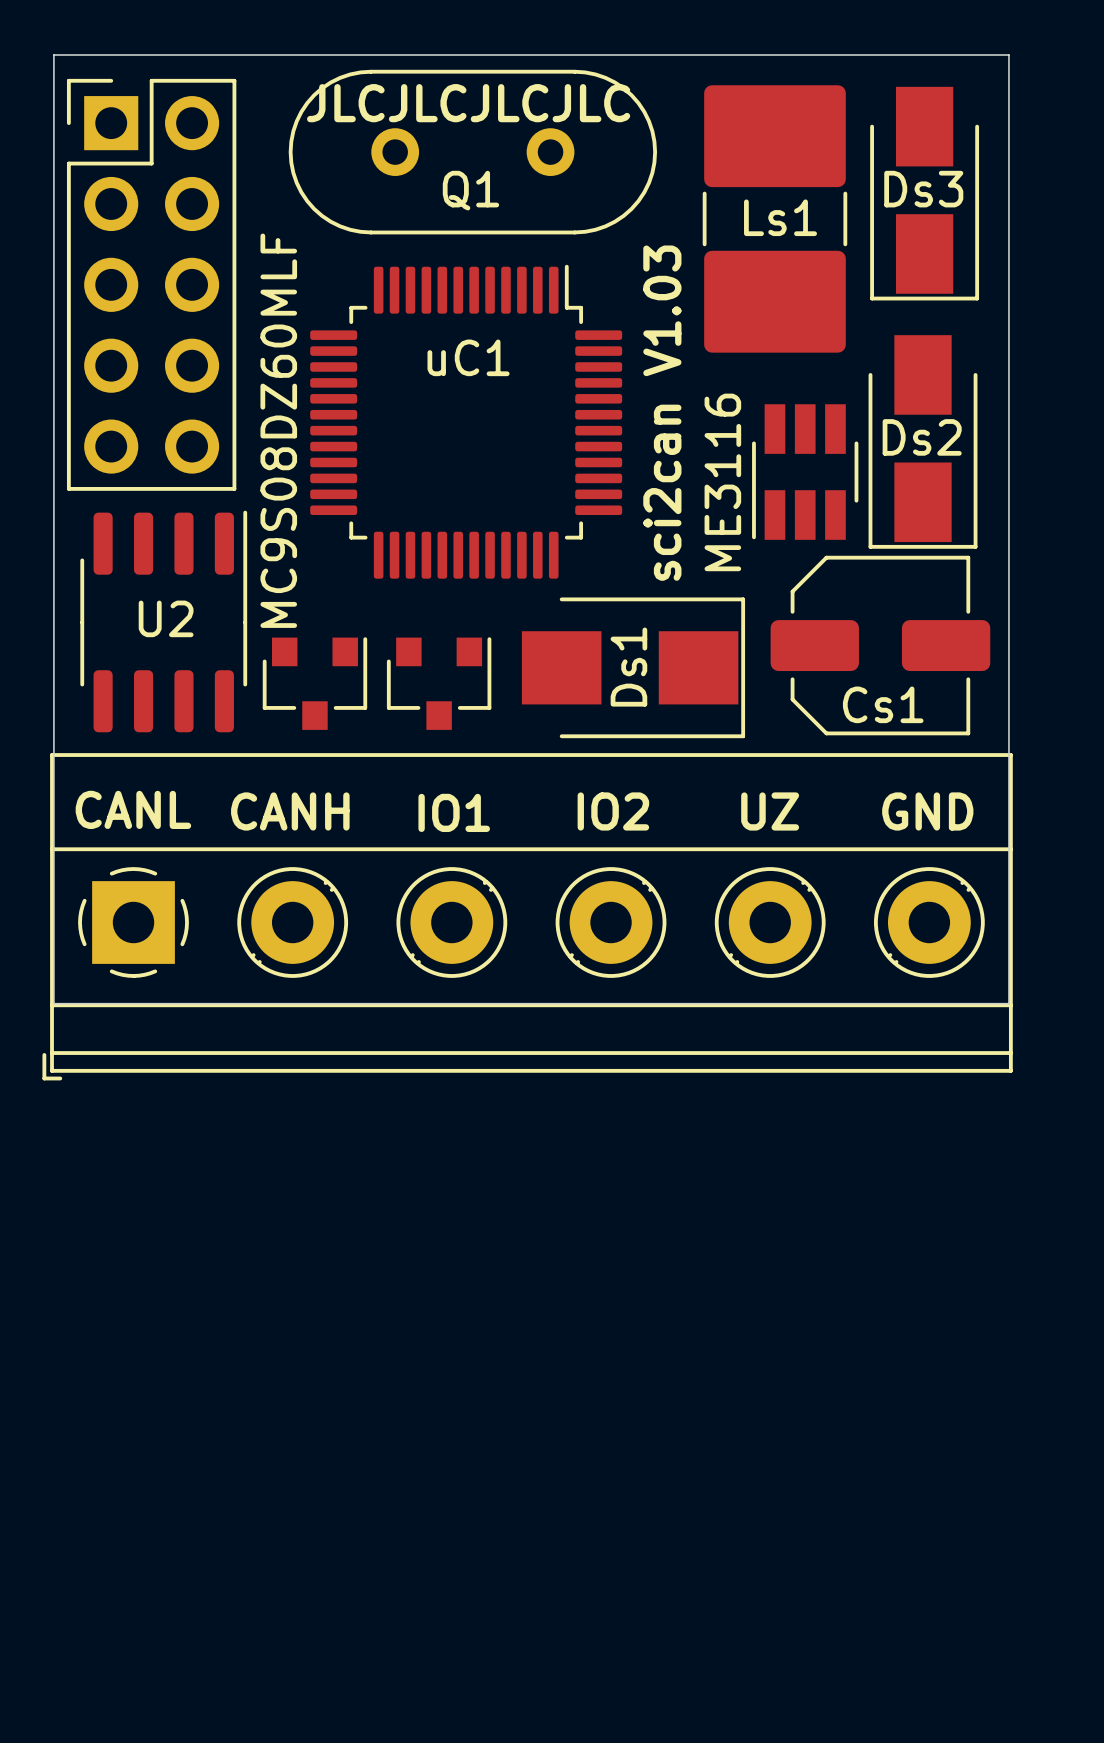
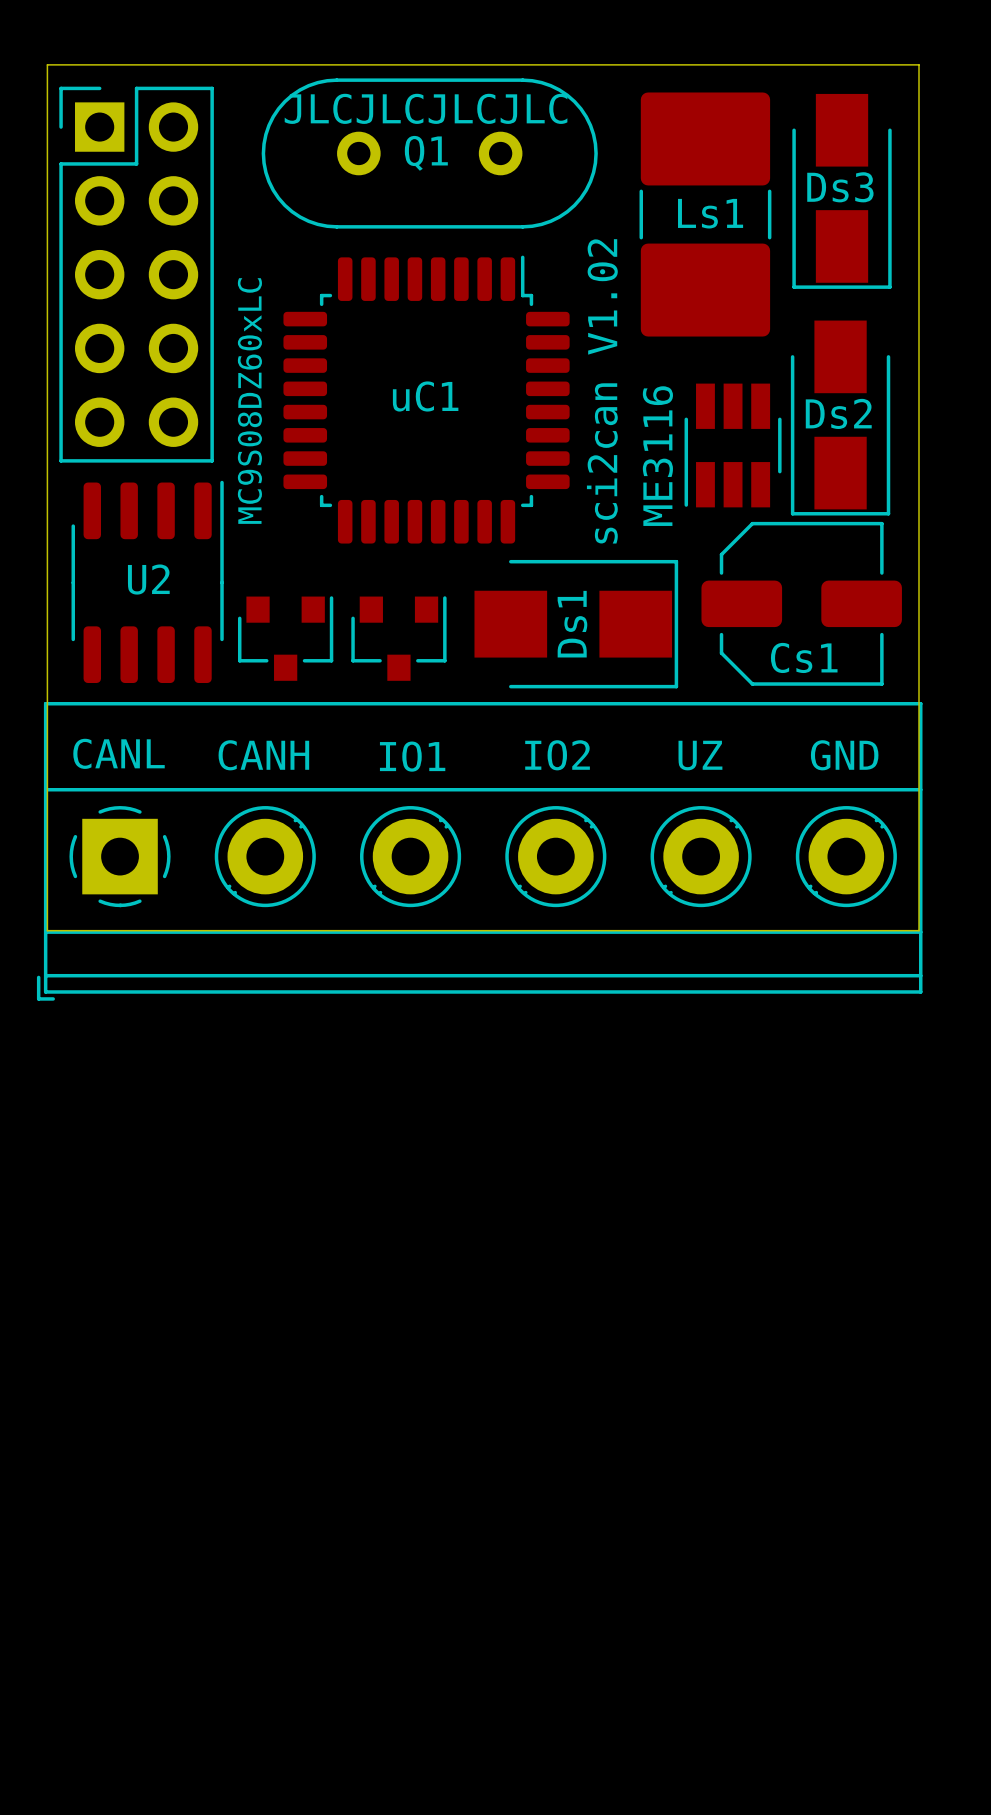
Q1 name position: Q1 (470, 190) -> Q1 (426, 153)
uC1 footprint: [310, 264, 623, 579] -> [283, 255, 570, 544]
uC1 name position: uC1 (468, 357) -> uC1 (425, 396)
text: sci2can V1.03 (662, 413) -> sci2can V1.02 (602, 391)
uC1 value: MC9S08DZ60MLF (278, 430) -> MC9S08DZ60xLC (249, 401)

